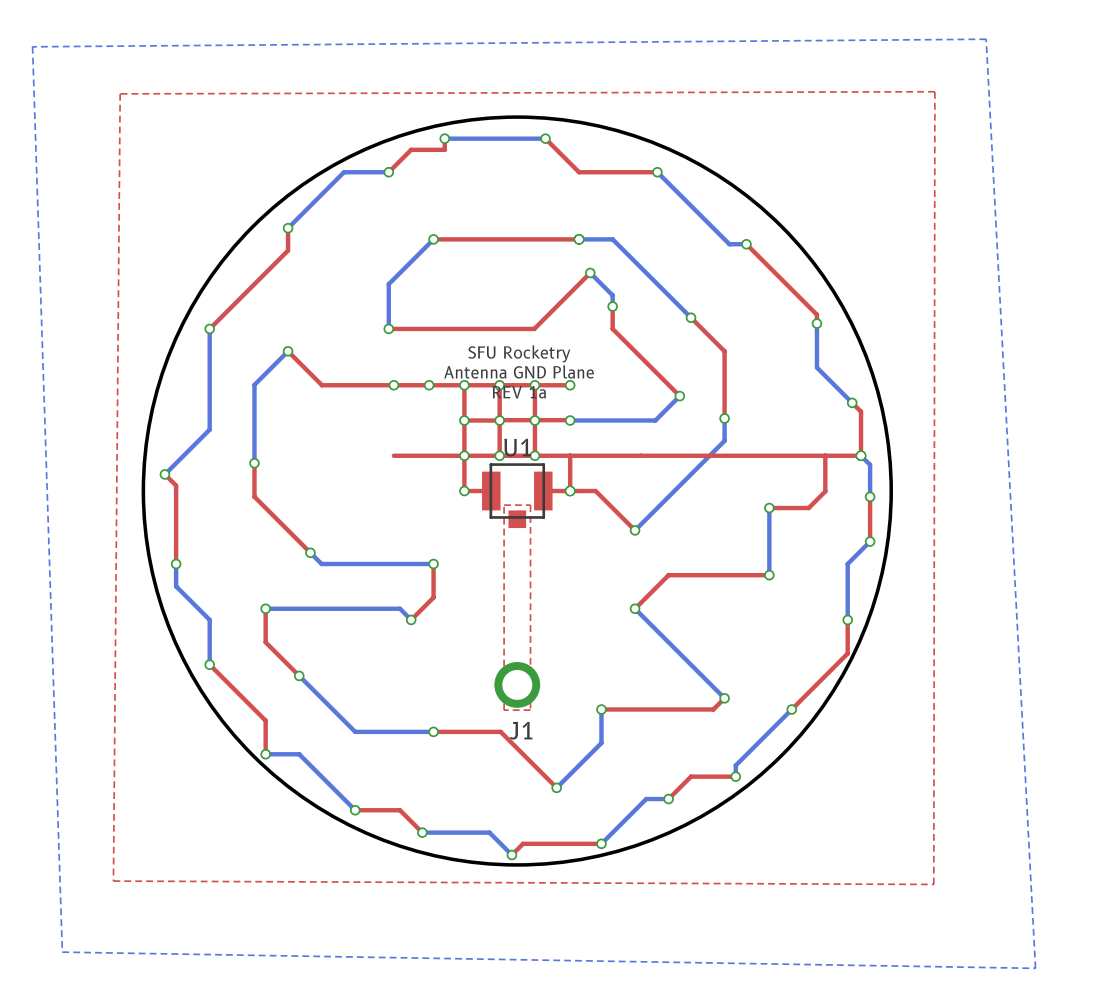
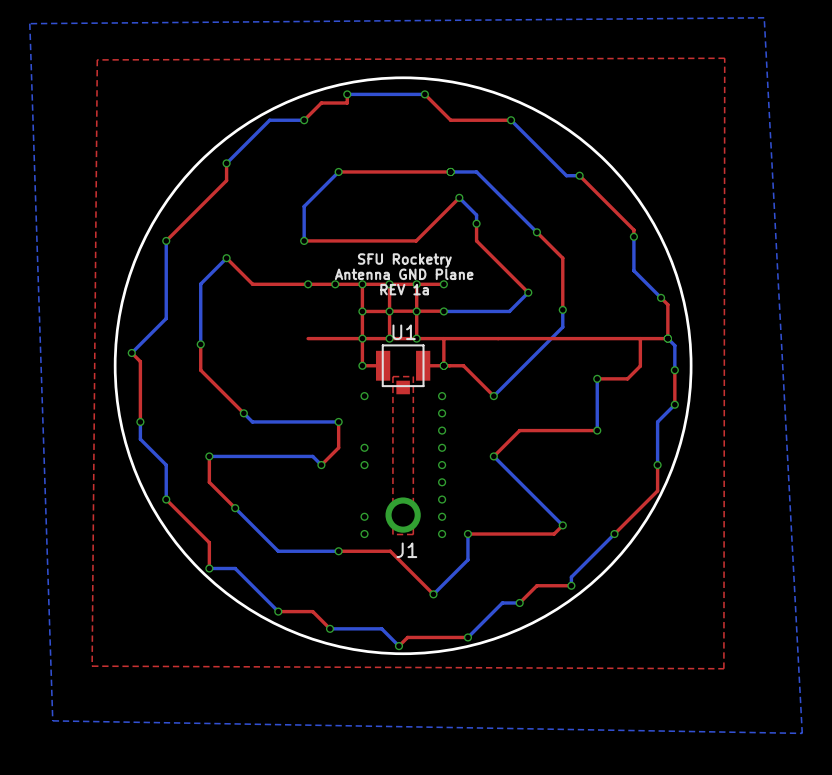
via: none -> (364, 396)
via: none -> (442, 396)
via: none -> (442, 413)
via: none -> (442, 430)
via: none -> (364, 447)
via: none -> (442, 447)
via: none -> (364, 465)
via: none -> (442, 465)
via: none -> (442, 482)
via: none -> (442, 499)
via: none -> (364, 516)
via: none -> (442, 516)
via: none -> (364, 534)
via: none -> (442, 534)

